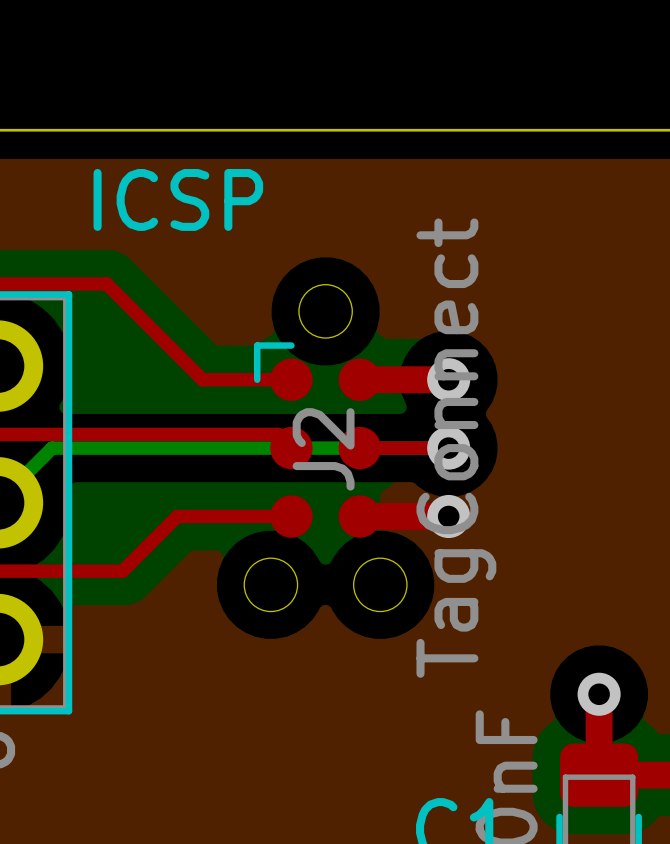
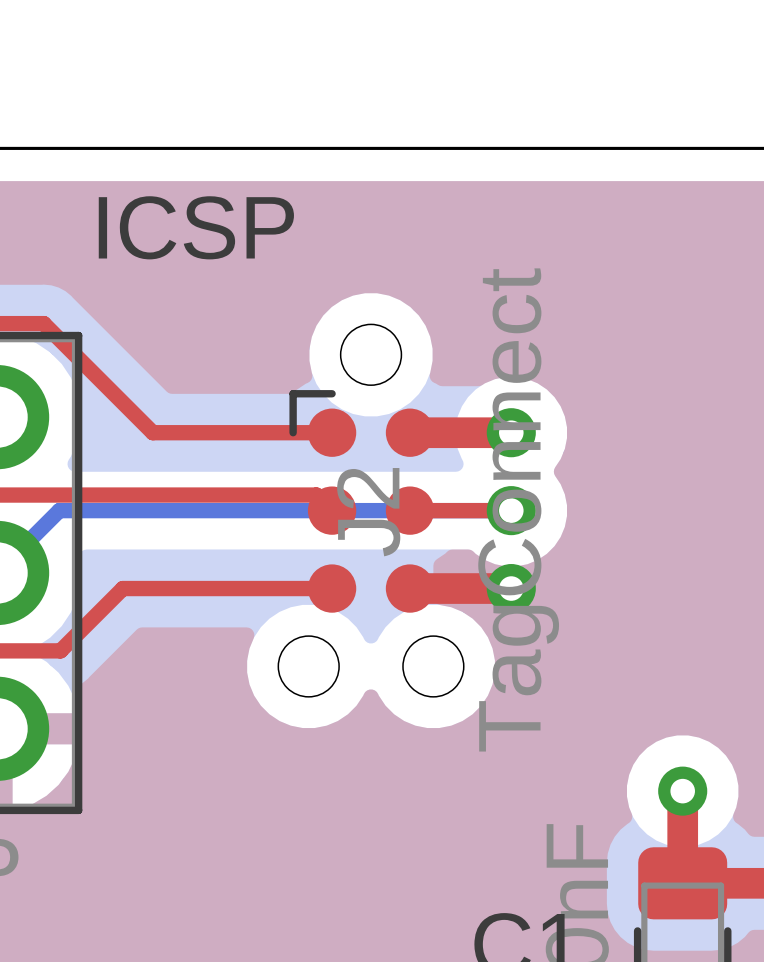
top track: (38, 284) (106, 284) (202, 379) -> (43, 323) (152, 432) (230, 432)
top track: (177, 516) (122, 571) (53, 571) -> (202, 588) (122, 588) (60, 650)

